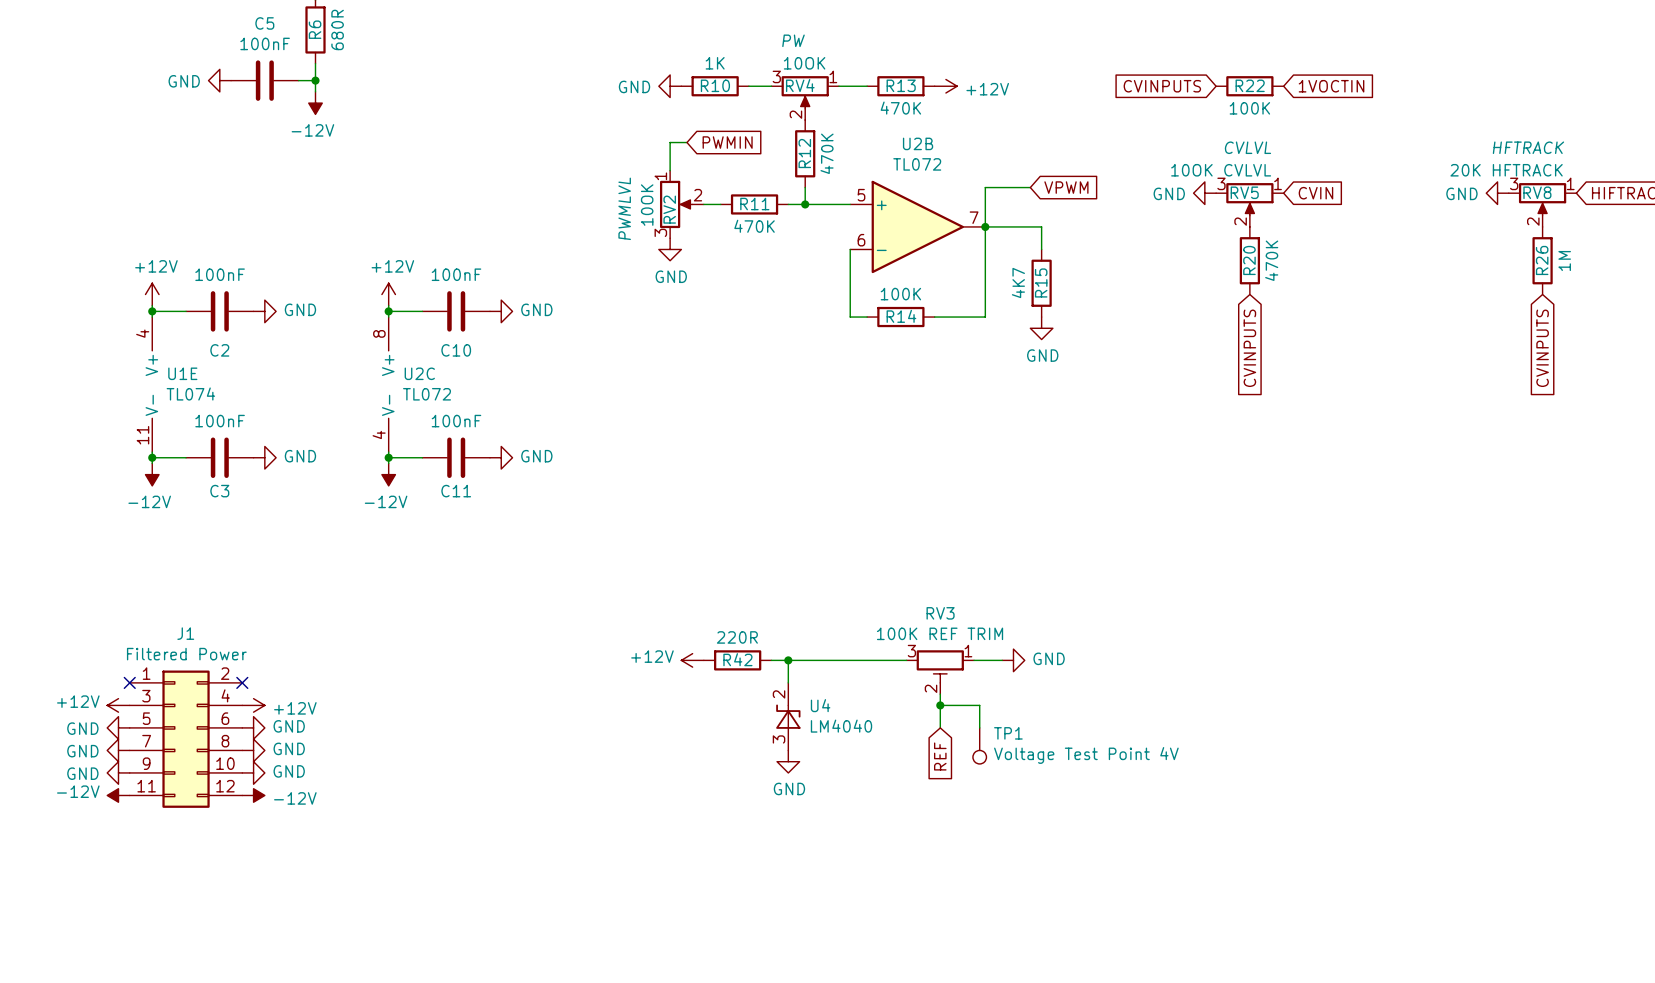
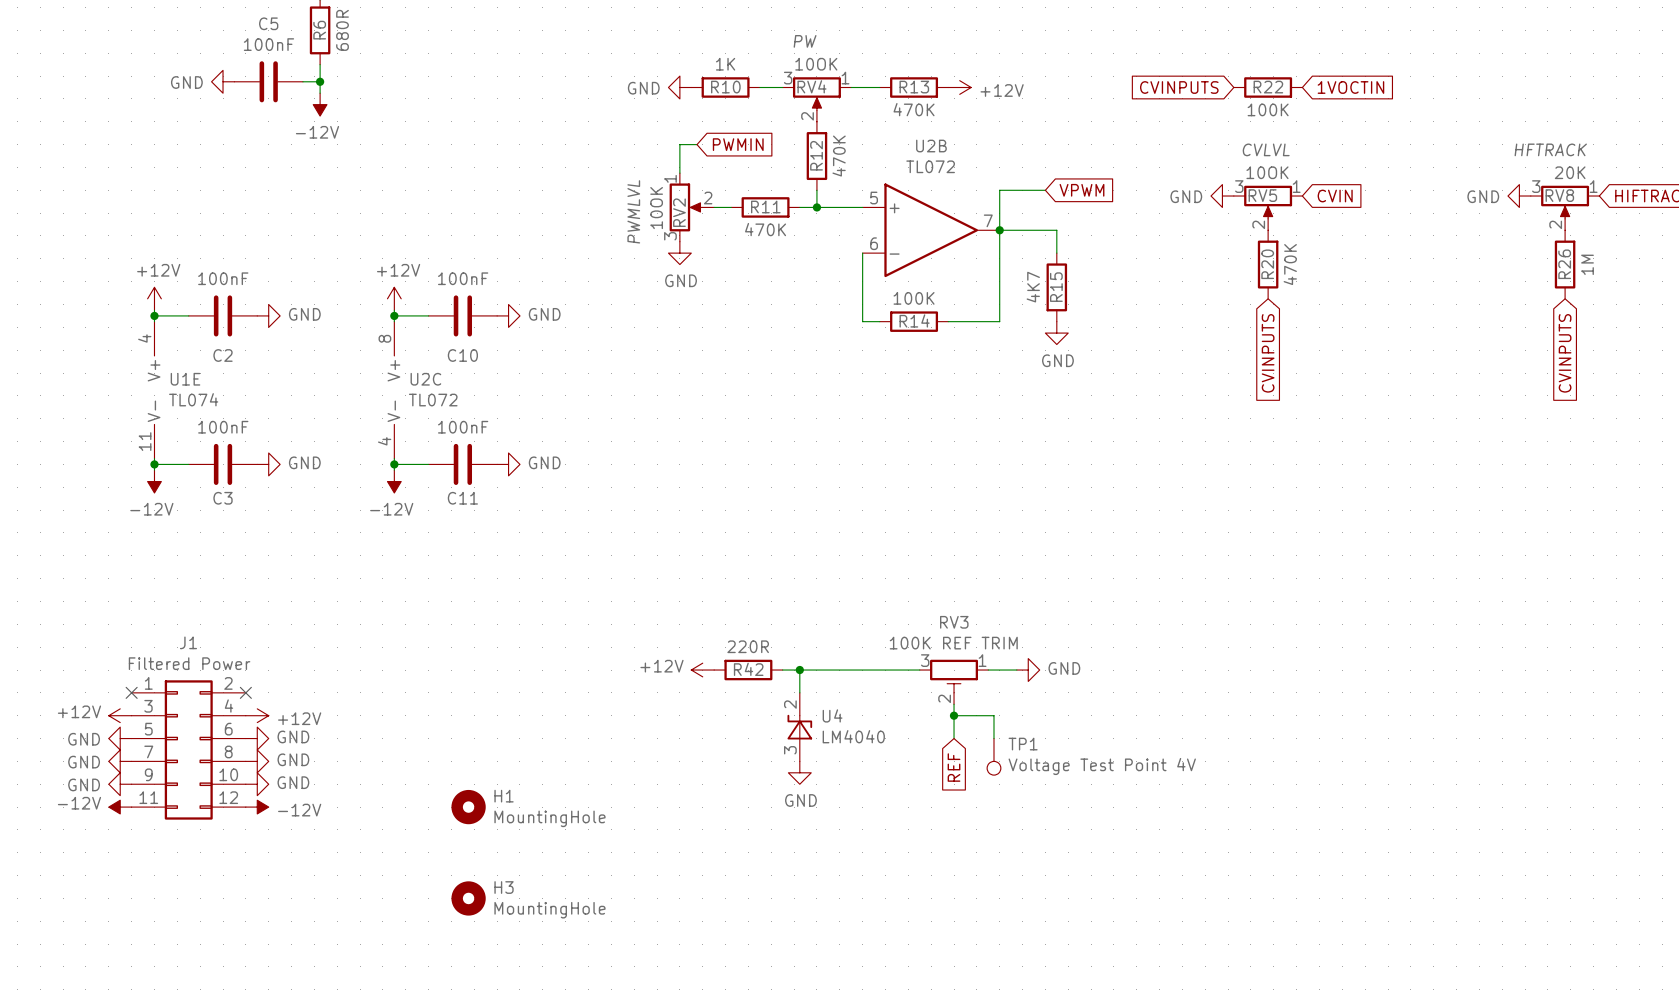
RV5 value: 10OK CVLVL (1221, 170) -> 10OK (1267, 172)
RV8 value: 20K HFTRACK (1506, 170) -> 20K (1570, 172)
H1: none -> MountingHole (468, 807)
H3: none -> MountingHole (468, 898)

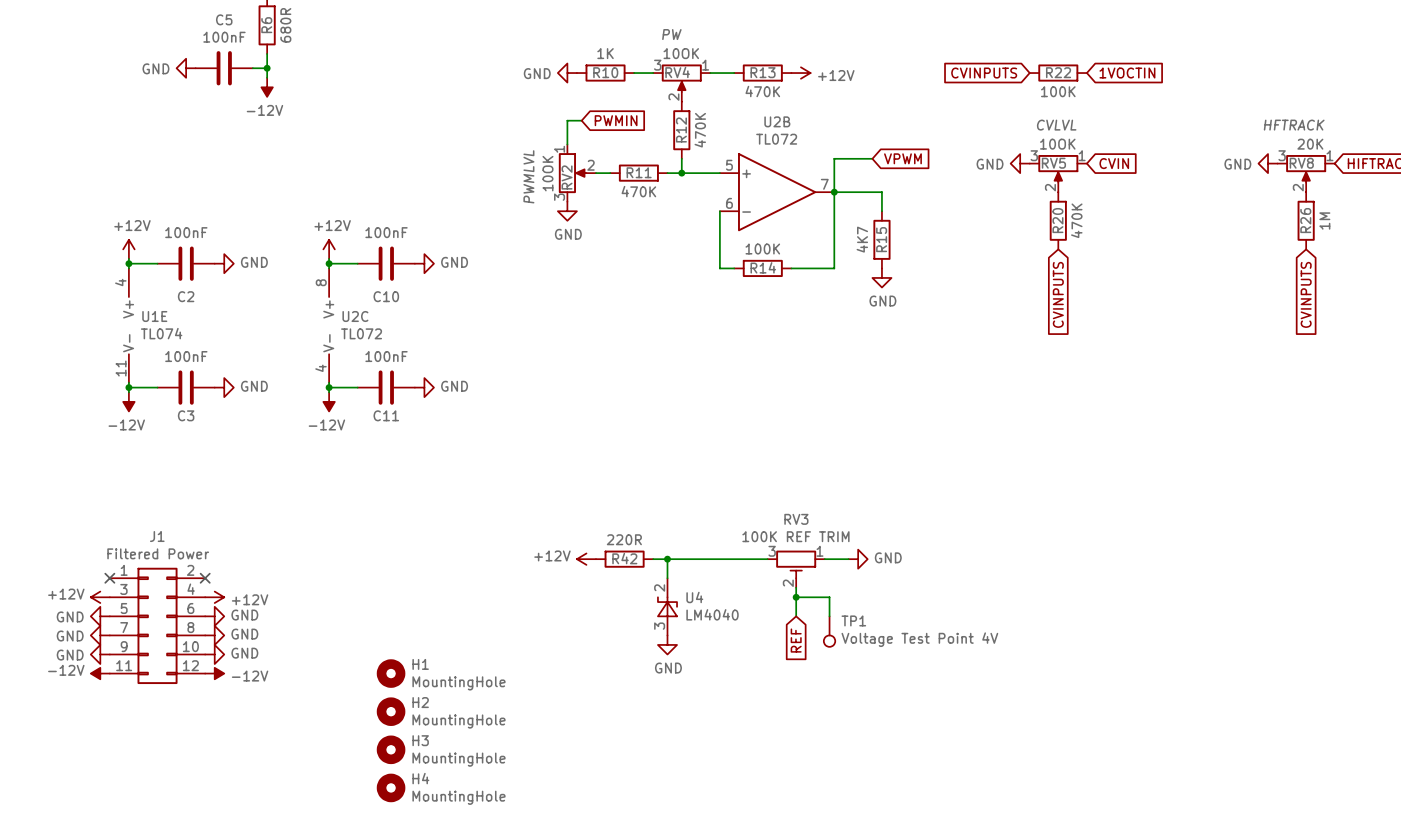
H2: none -> MountingHole (391, 711)
H4: none -> MountingHole (391, 787)

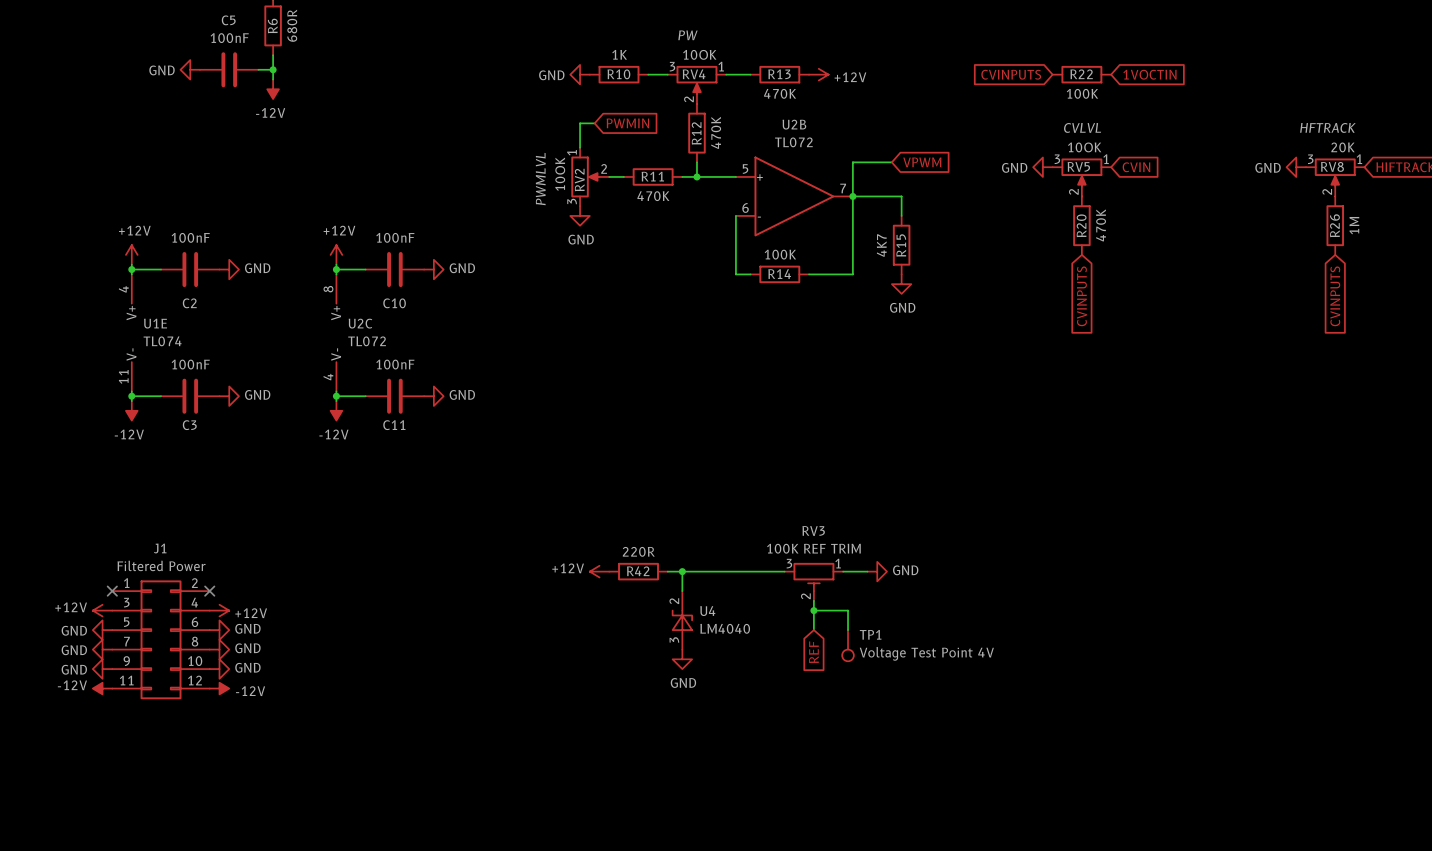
H1: MountingHole (391, 673) -> none
H2: MountingHole (391, 711) -> none
H3: MountingHole (391, 749) -> none
H4: MountingHole (391, 787) -> none

